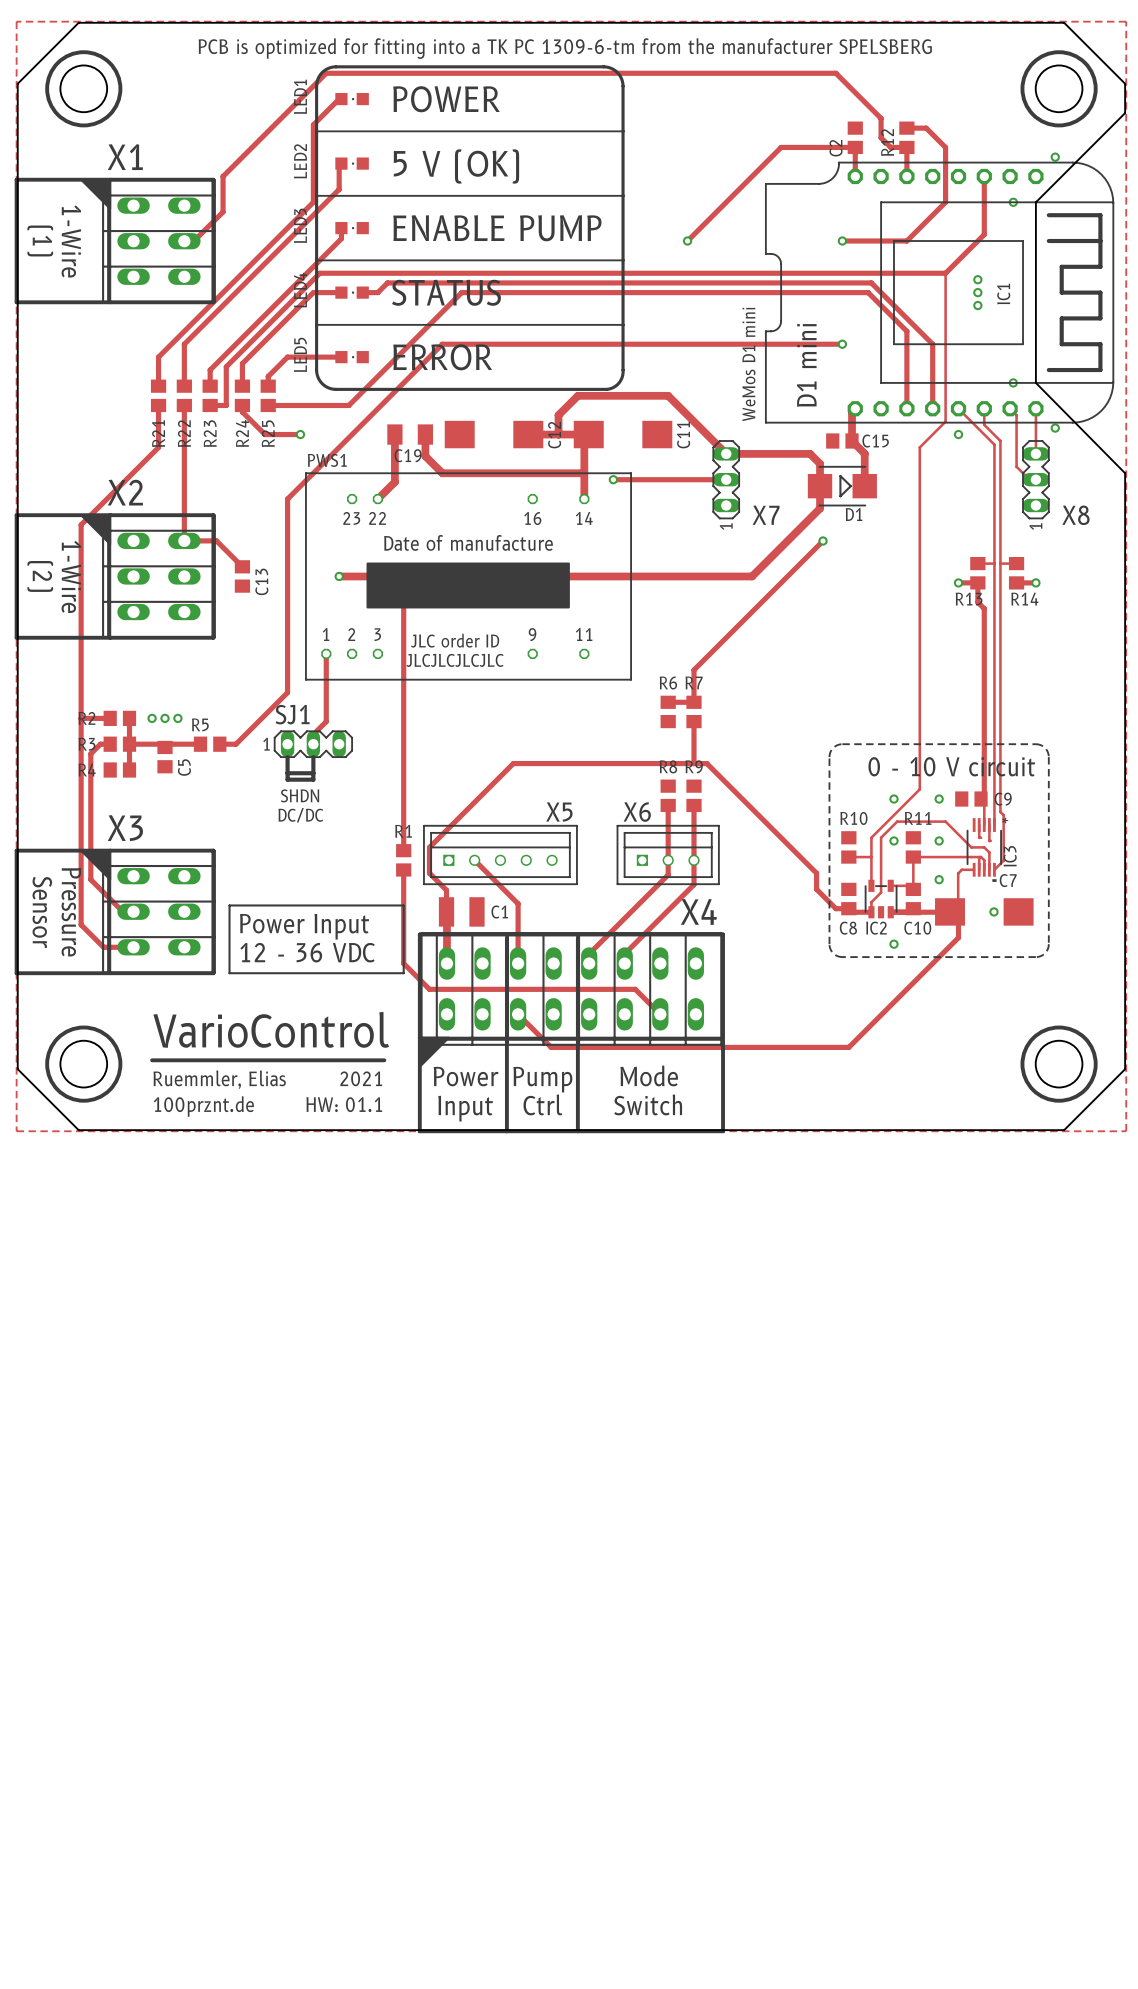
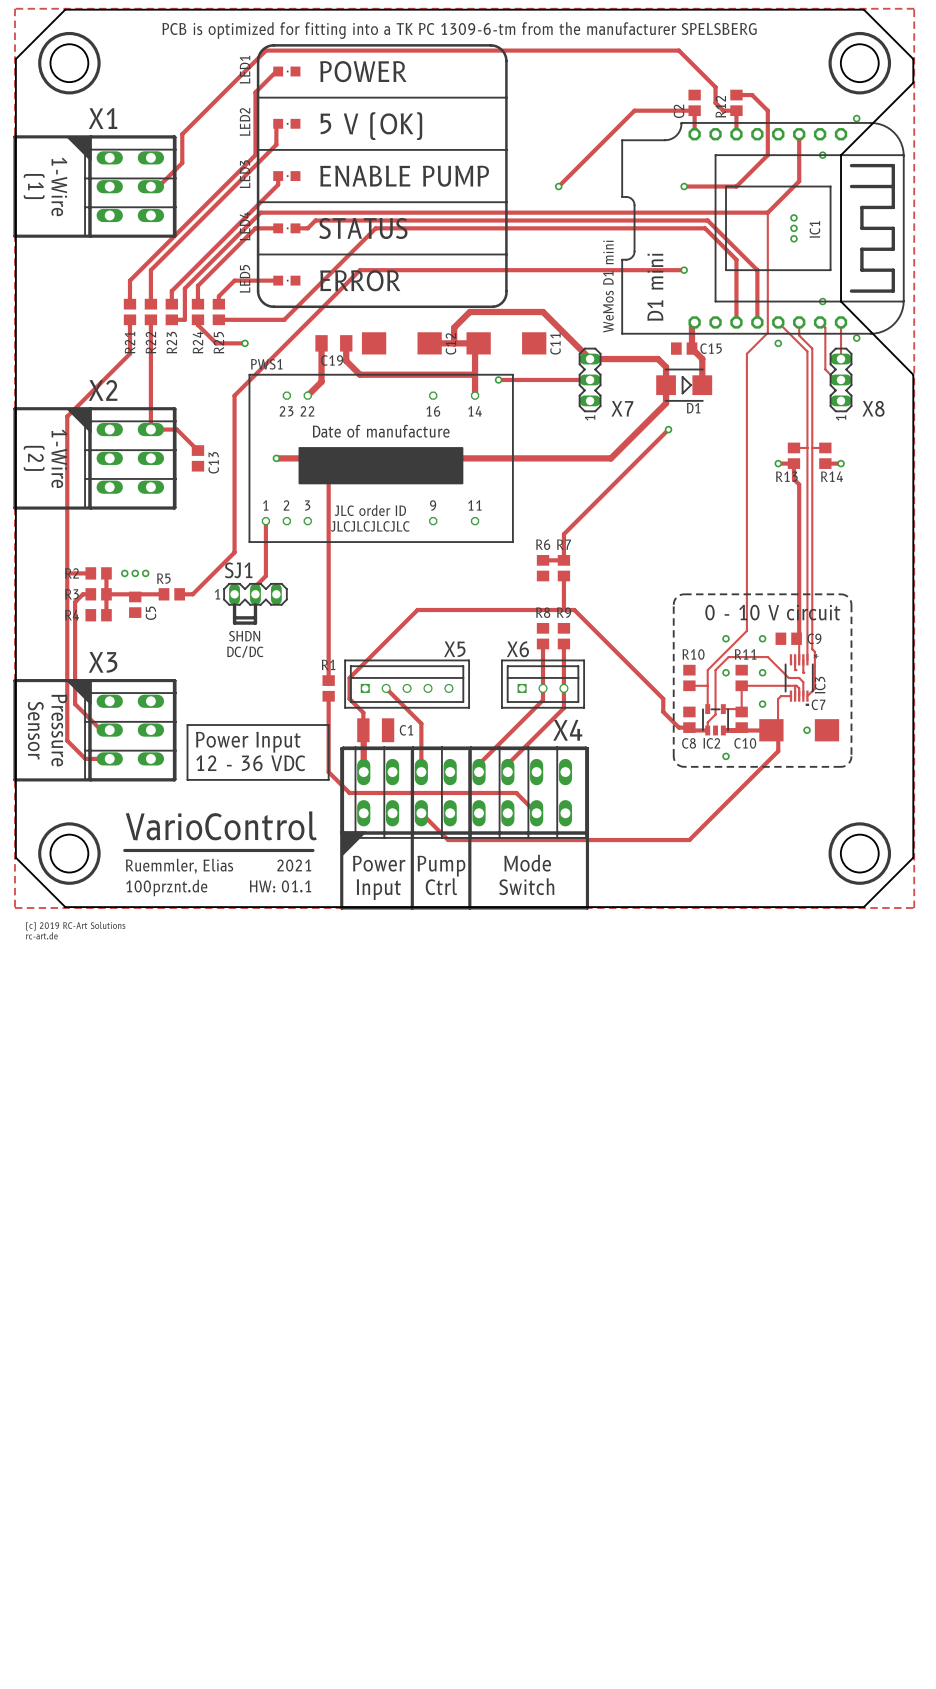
drawing: none -> [26, 921, 126, 940]

